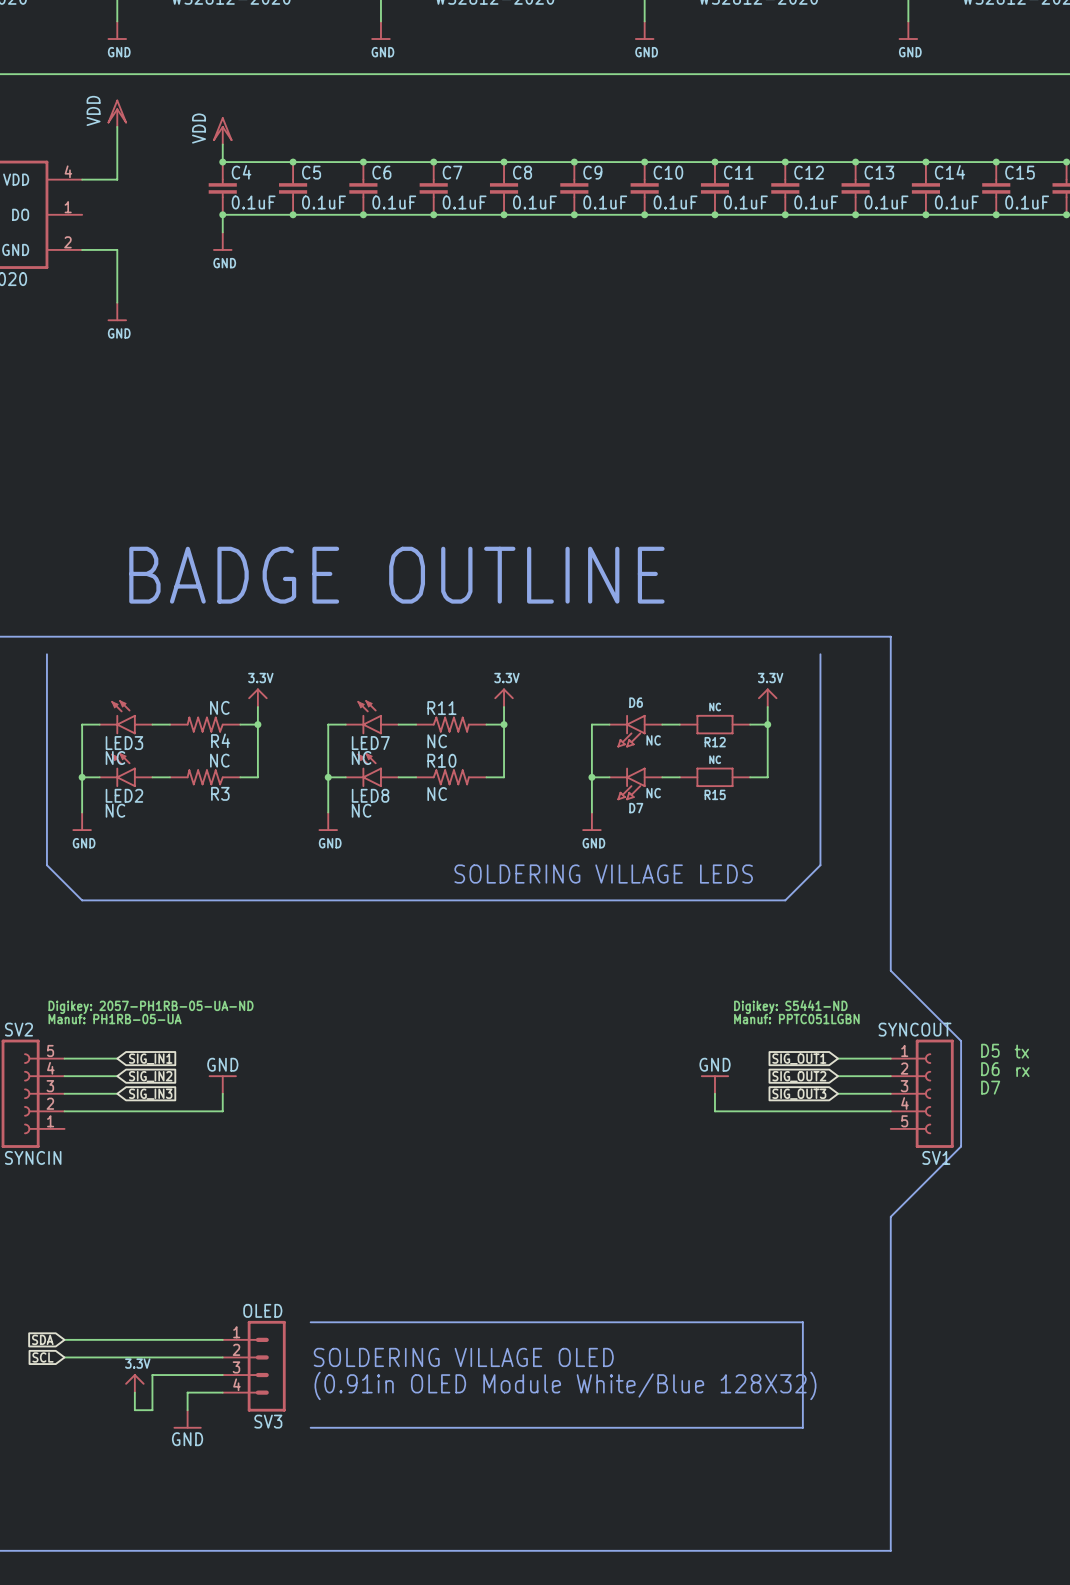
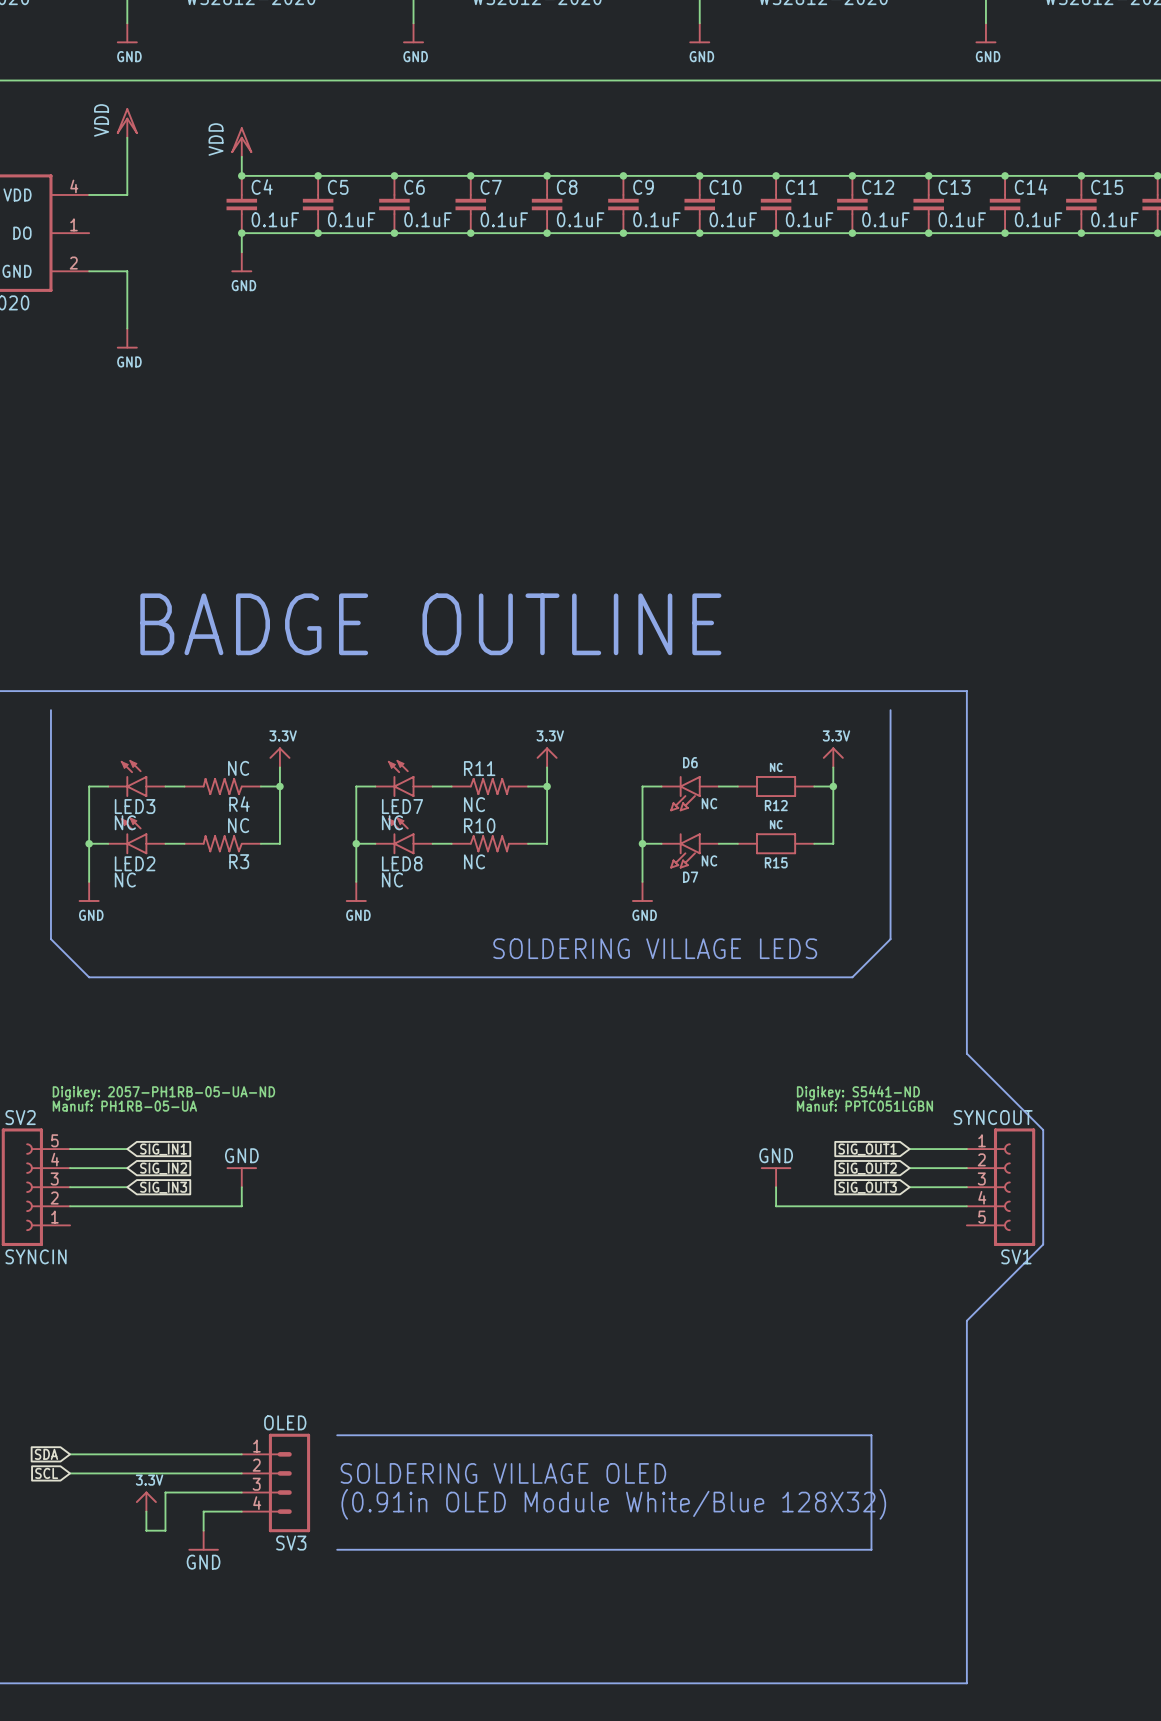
text: D5 (990, 1050) -> none
text: tx (1021, 1051) -> none
text: D6 (990, 1069) -> none
text: rx (1022, 1072) -> none
text: D7 (990, 1087) -> none

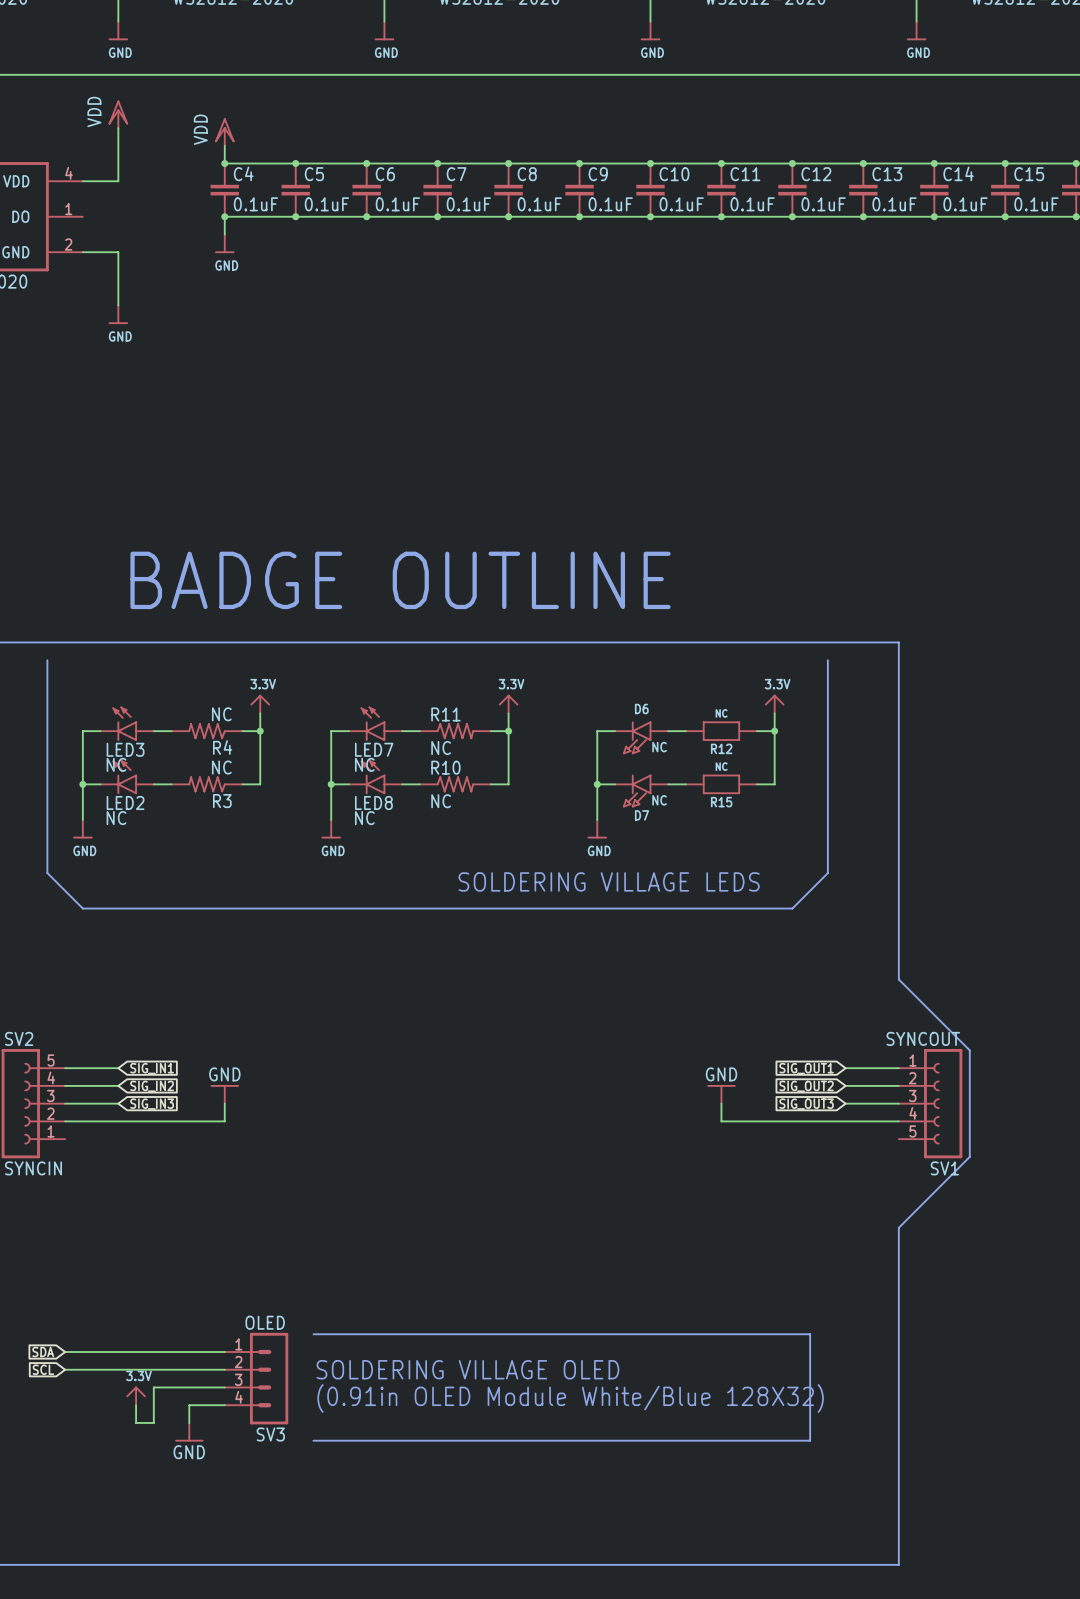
text: Digikey: 2057-PH1RB-05-UA-ND (163, 1093) -> none
text: Digikey: S5441-ND (858, 1093) -> none
text: Manuf: PH1RB-05-UA (124, 1106) -> none
text: Manuf: PPTC051LGBN (864, 1106) -> none

